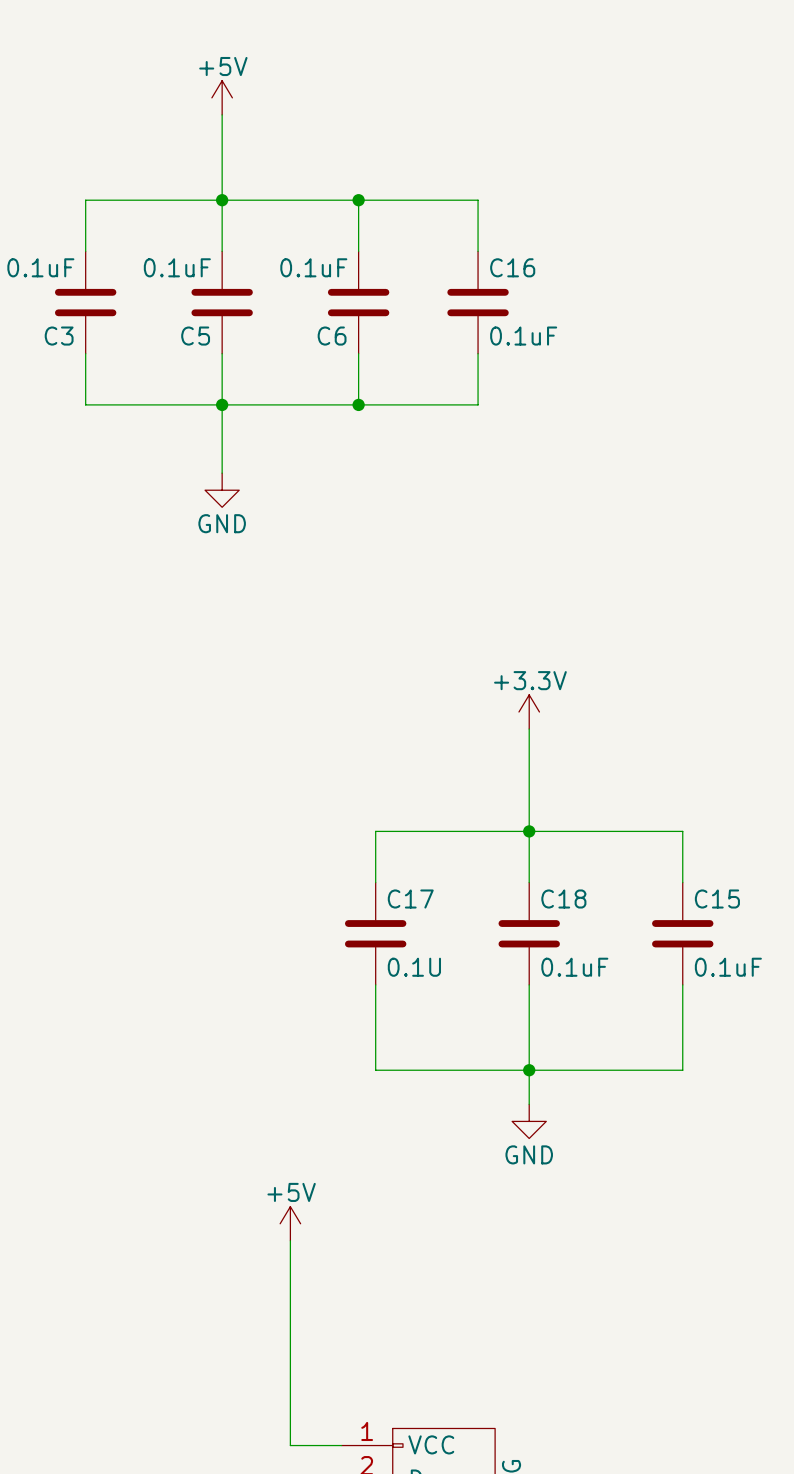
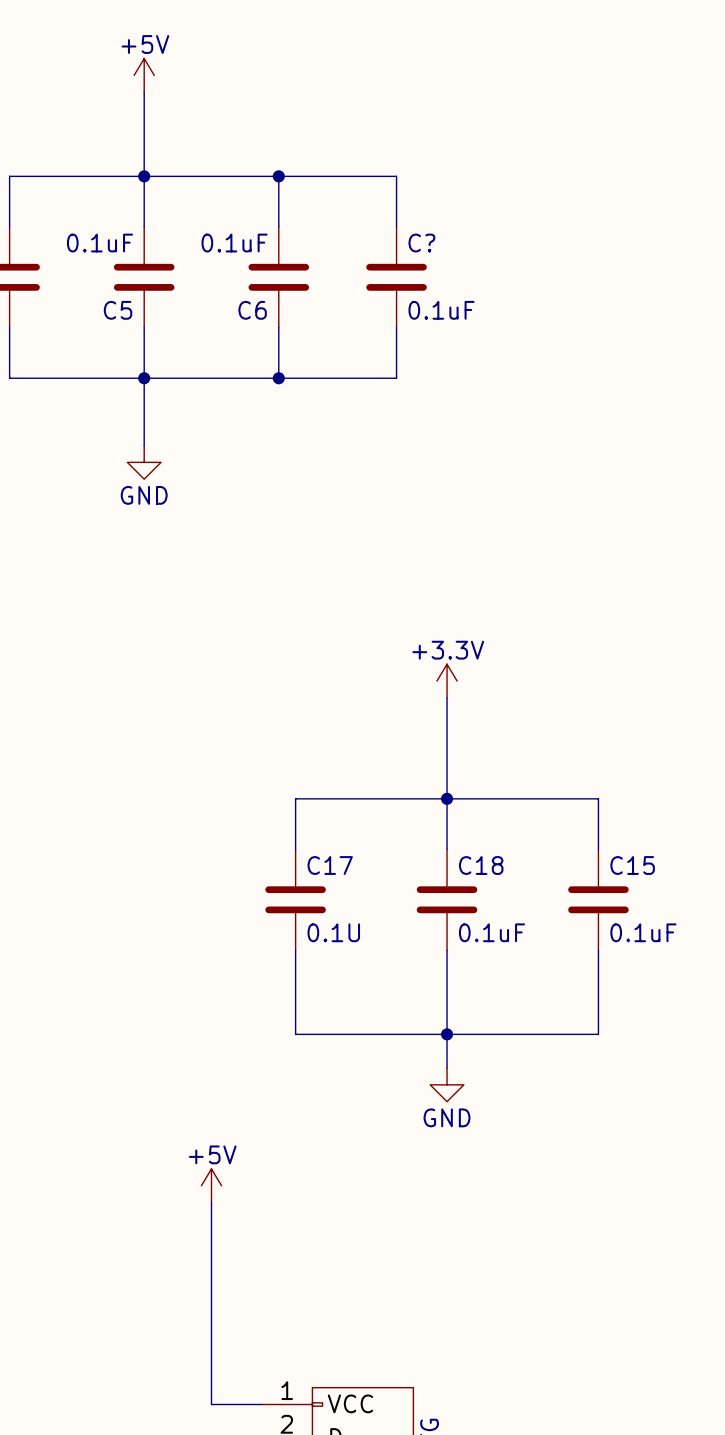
C16 name: C16 (512, 267) -> C? (421, 243)

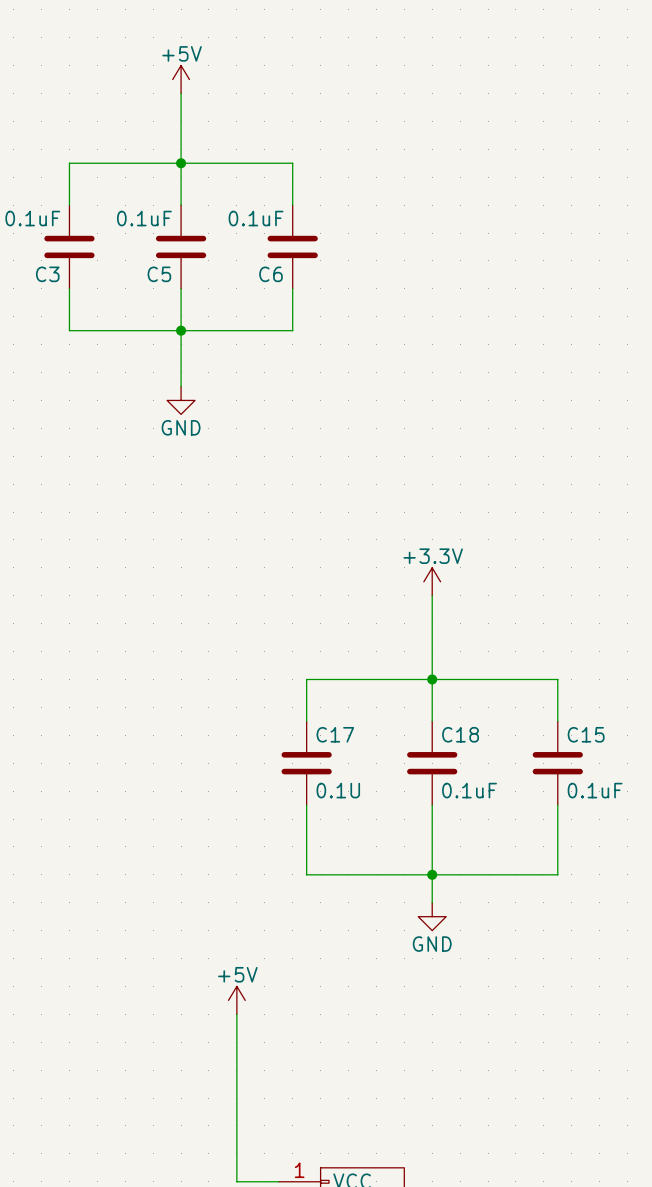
wire: (278, 176) (396, 176) (396, 226) -> none
junction: (278, 176) -> none
C?: 0.1uF (396, 277) -> none
wire: (396, 327) (396, 378) (278, 378) -> none
junction: (278, 378) -> none

